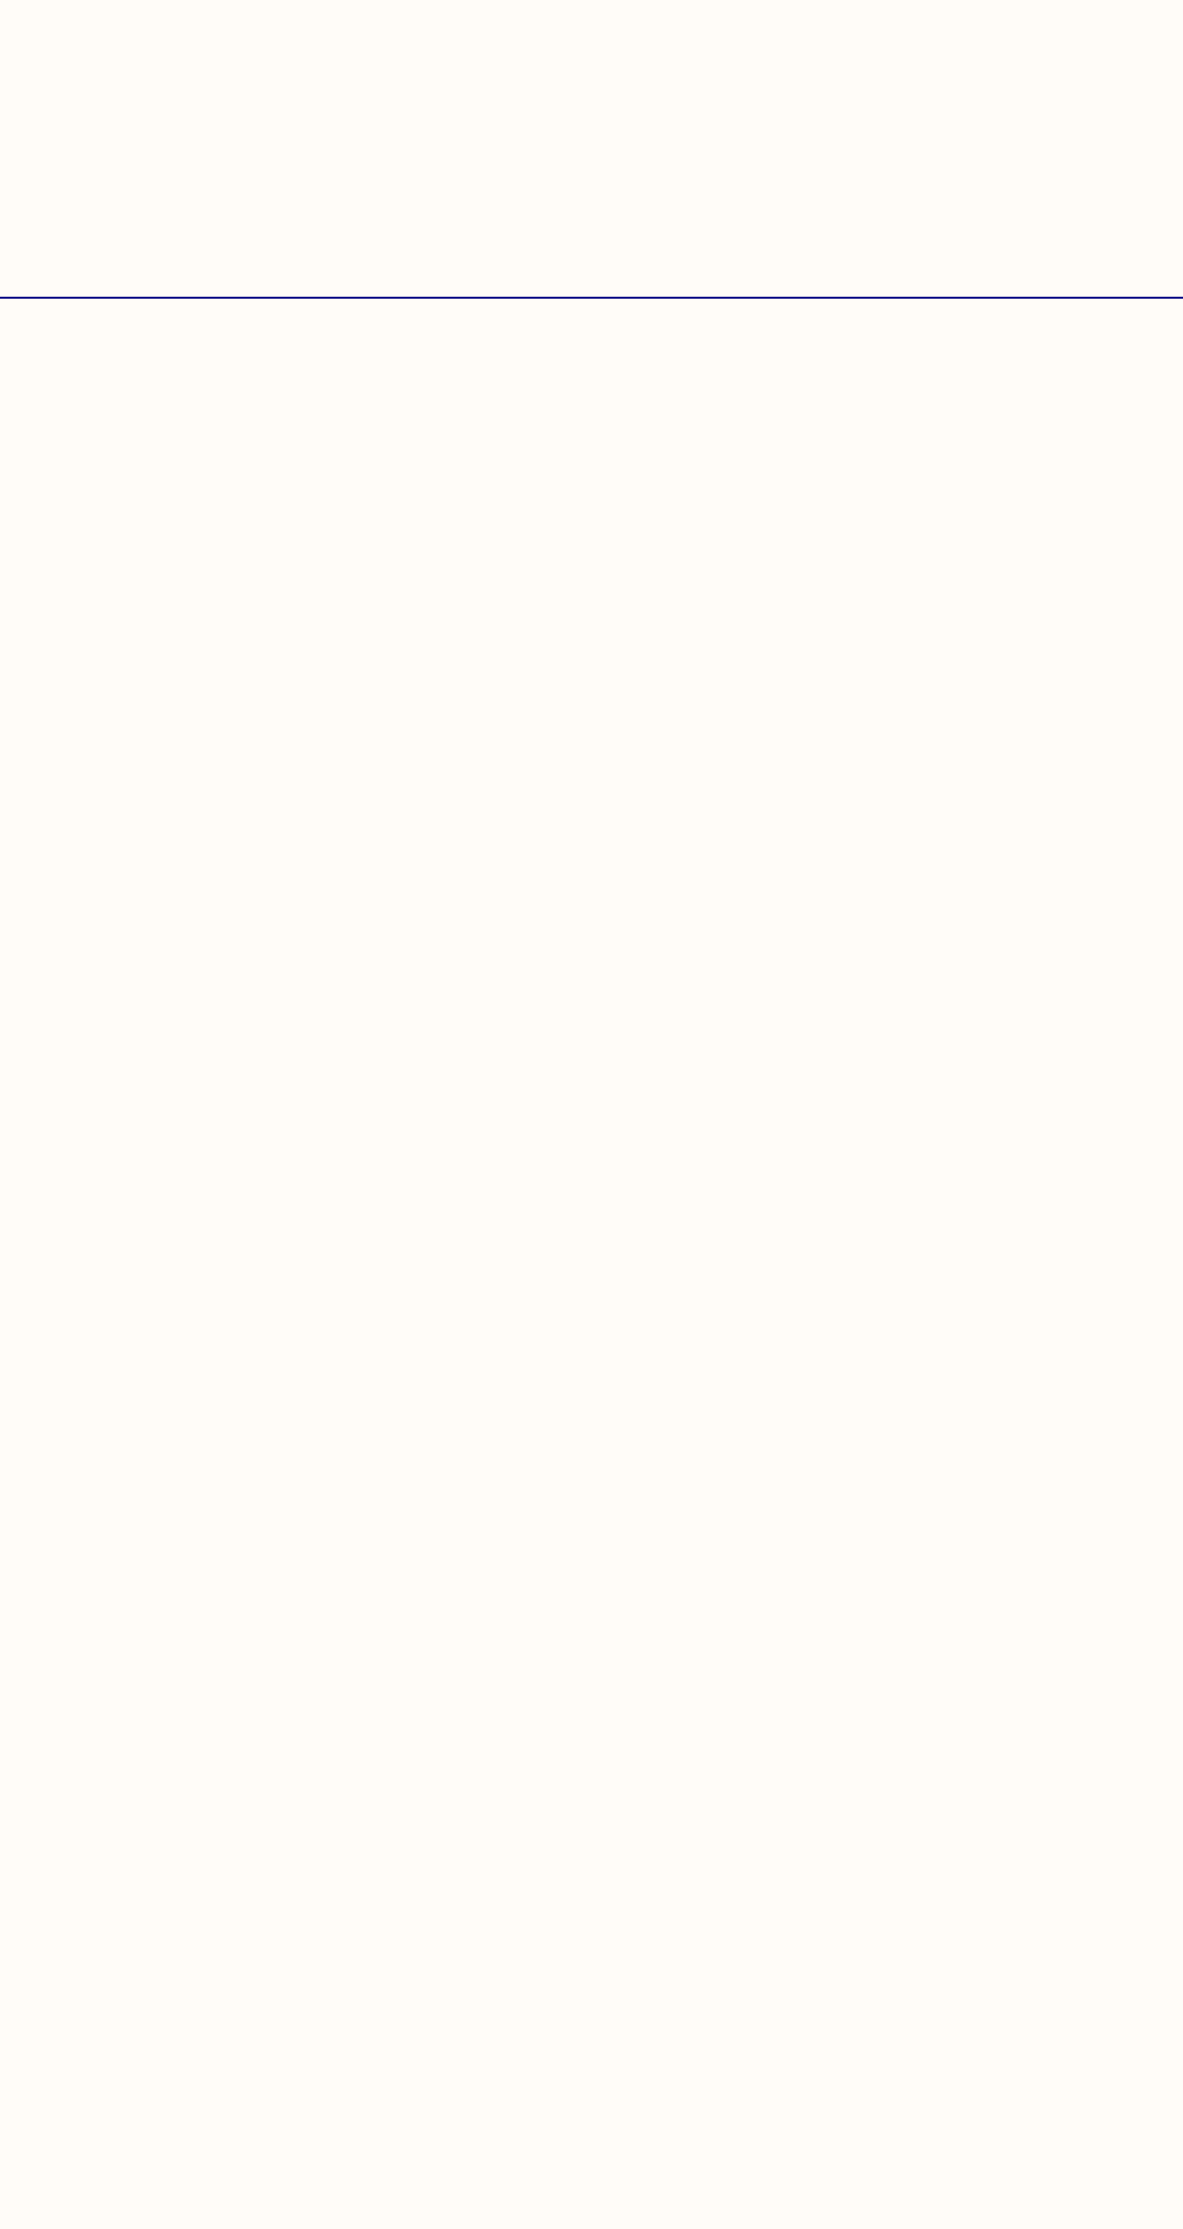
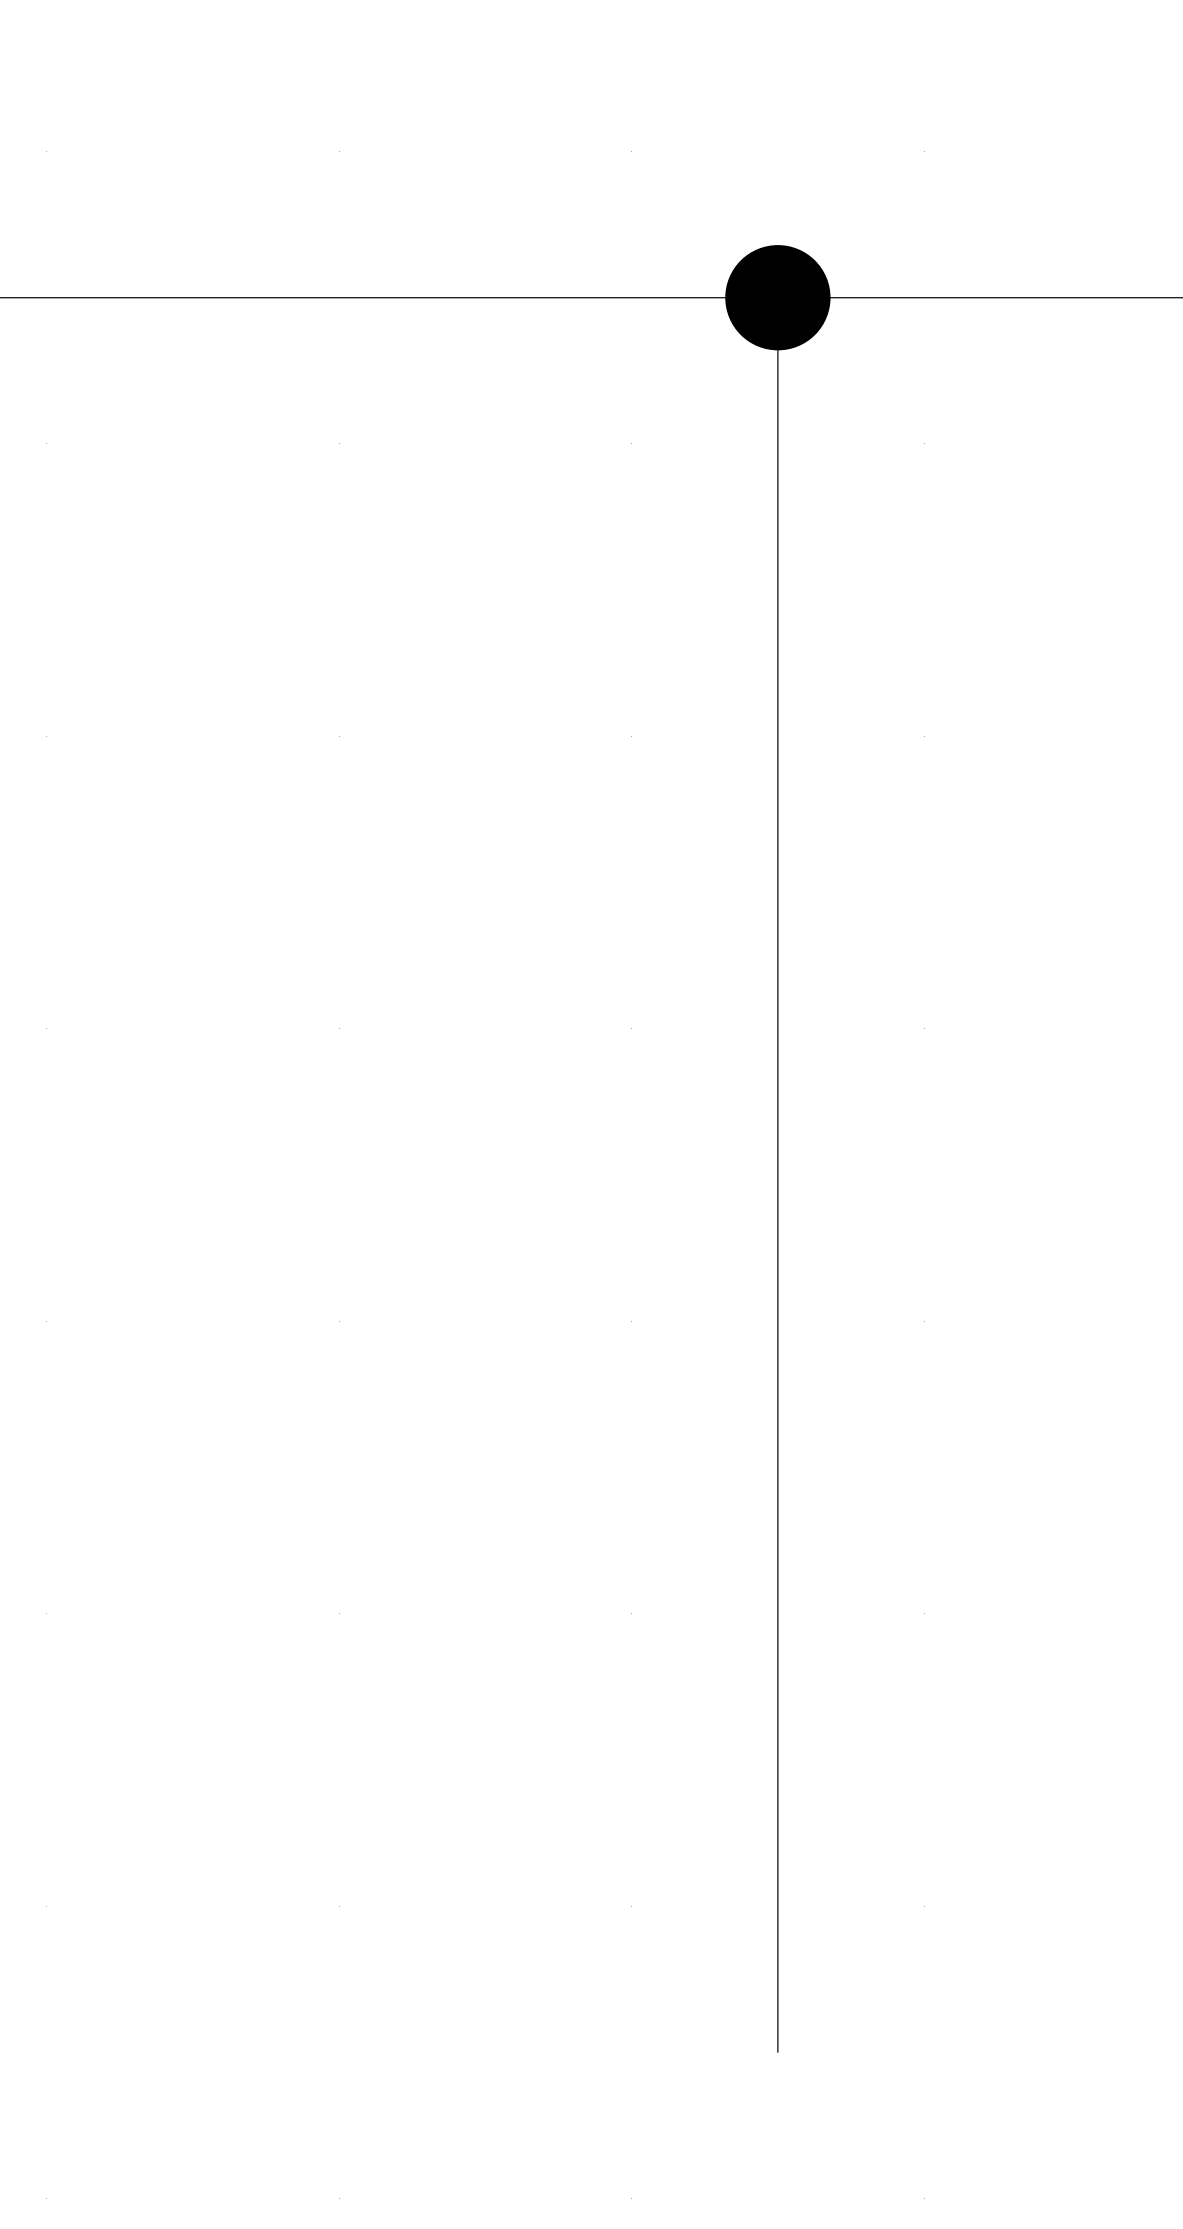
wire: none -> (777, 297) (777, 2052)
junction: none -> (777, 297)

